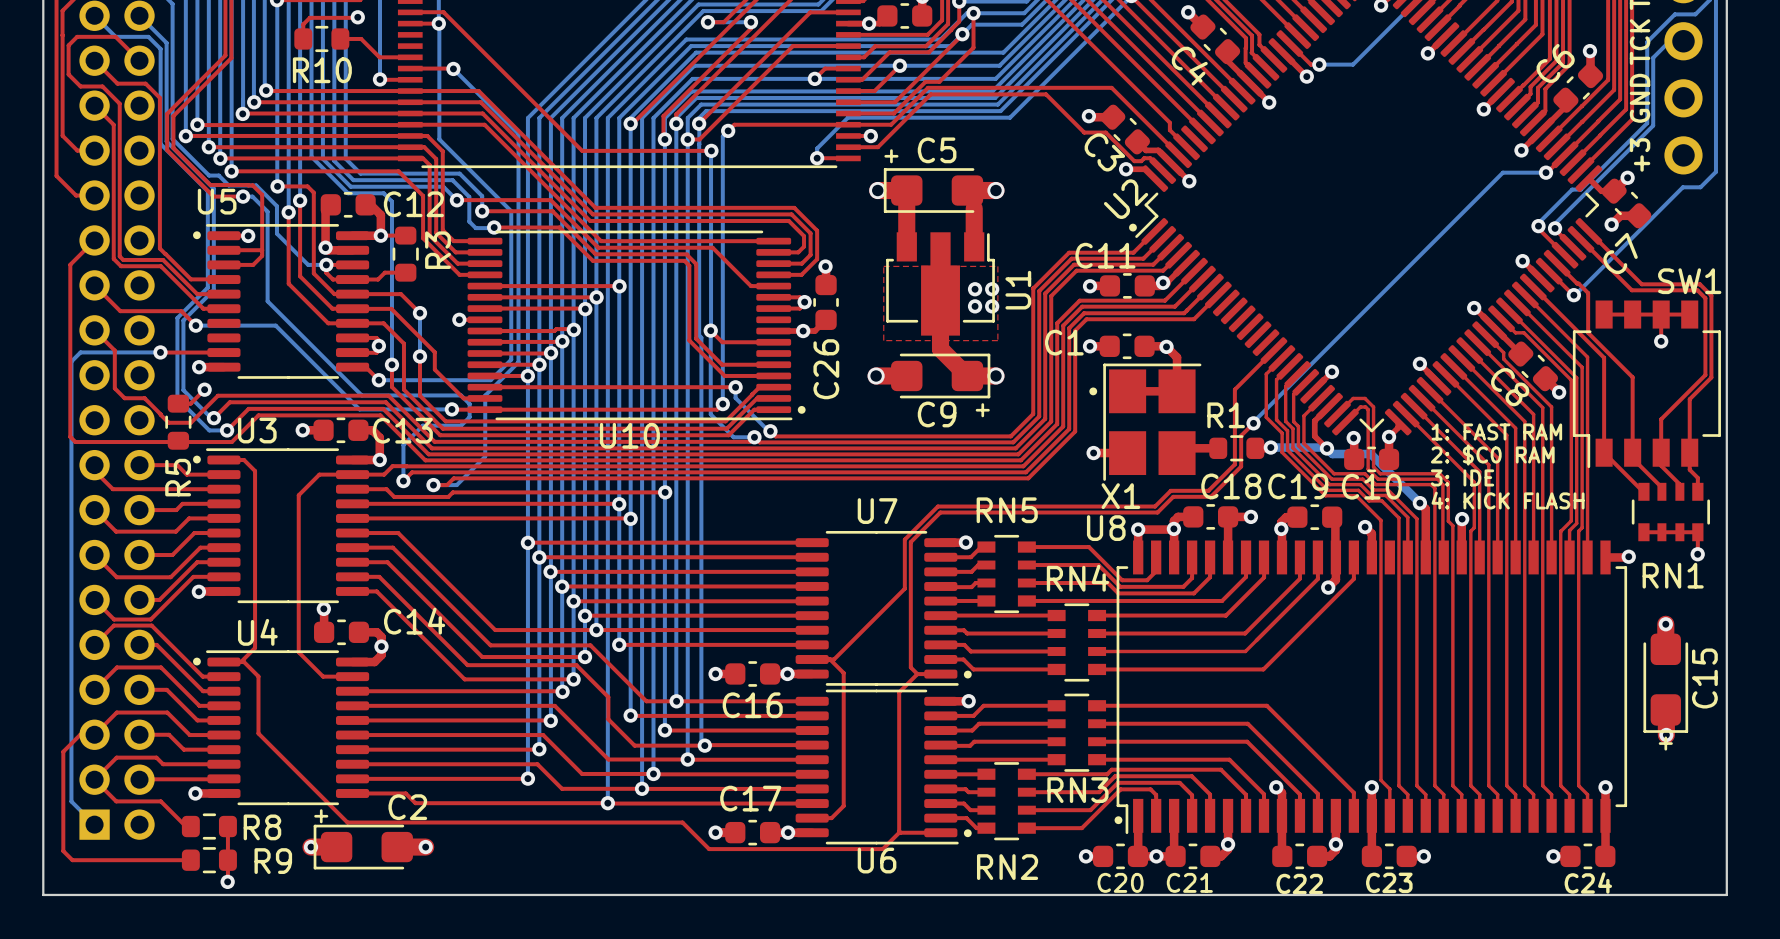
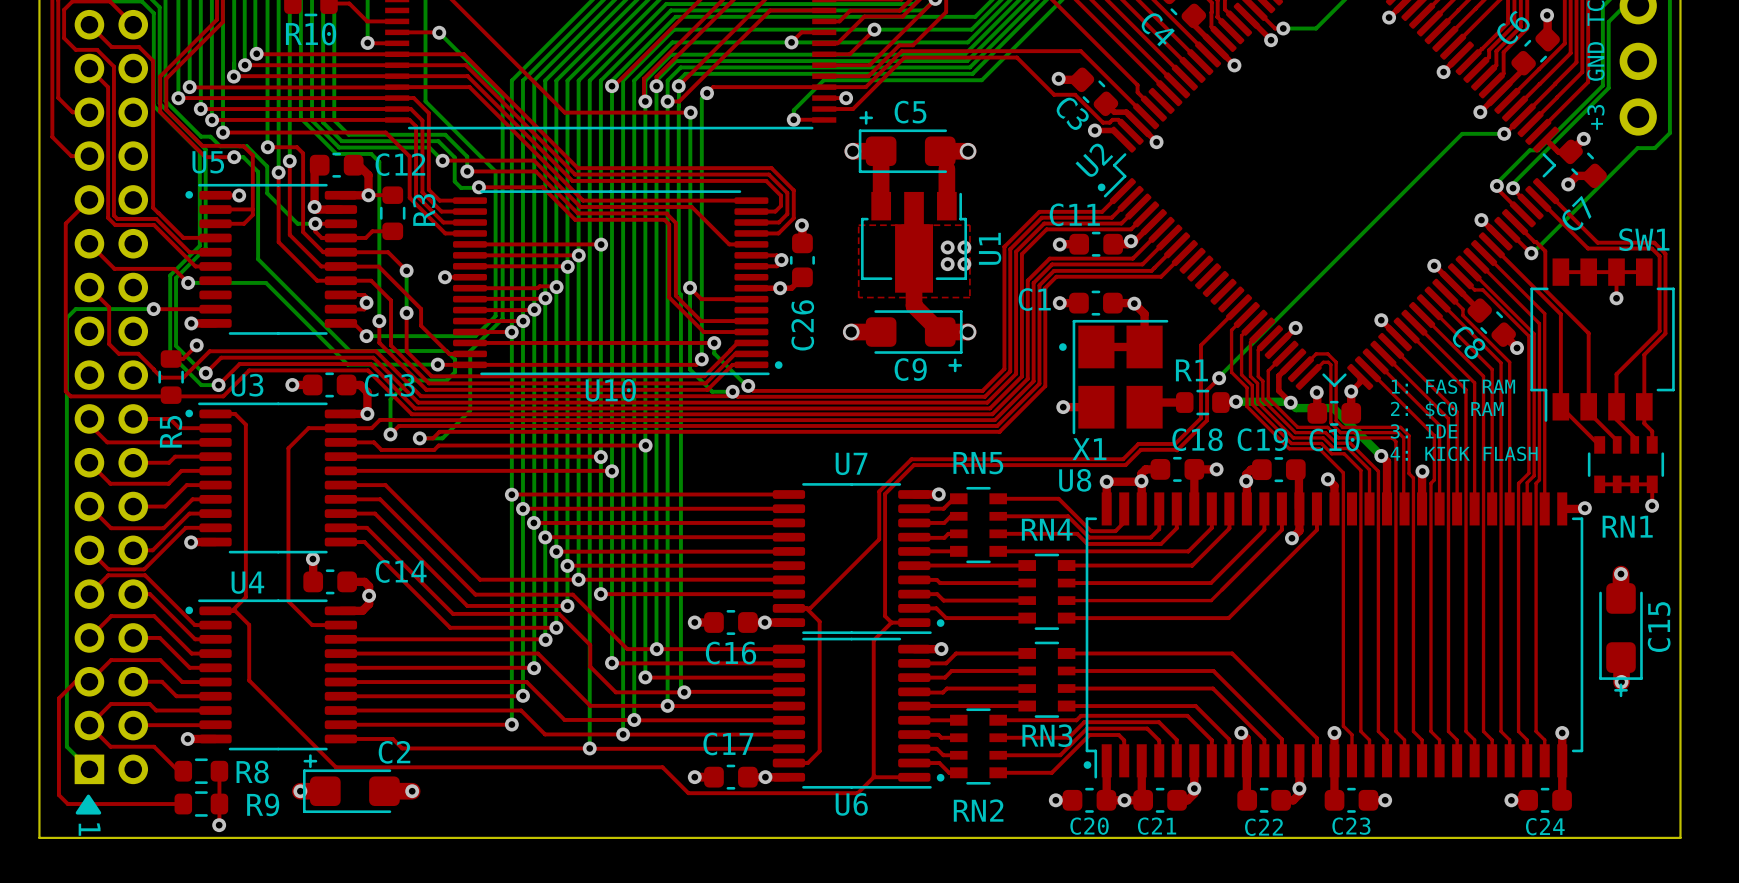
drawing: none -> [75, 794, 102, 815]
text: none -> 1 (89, 829)

